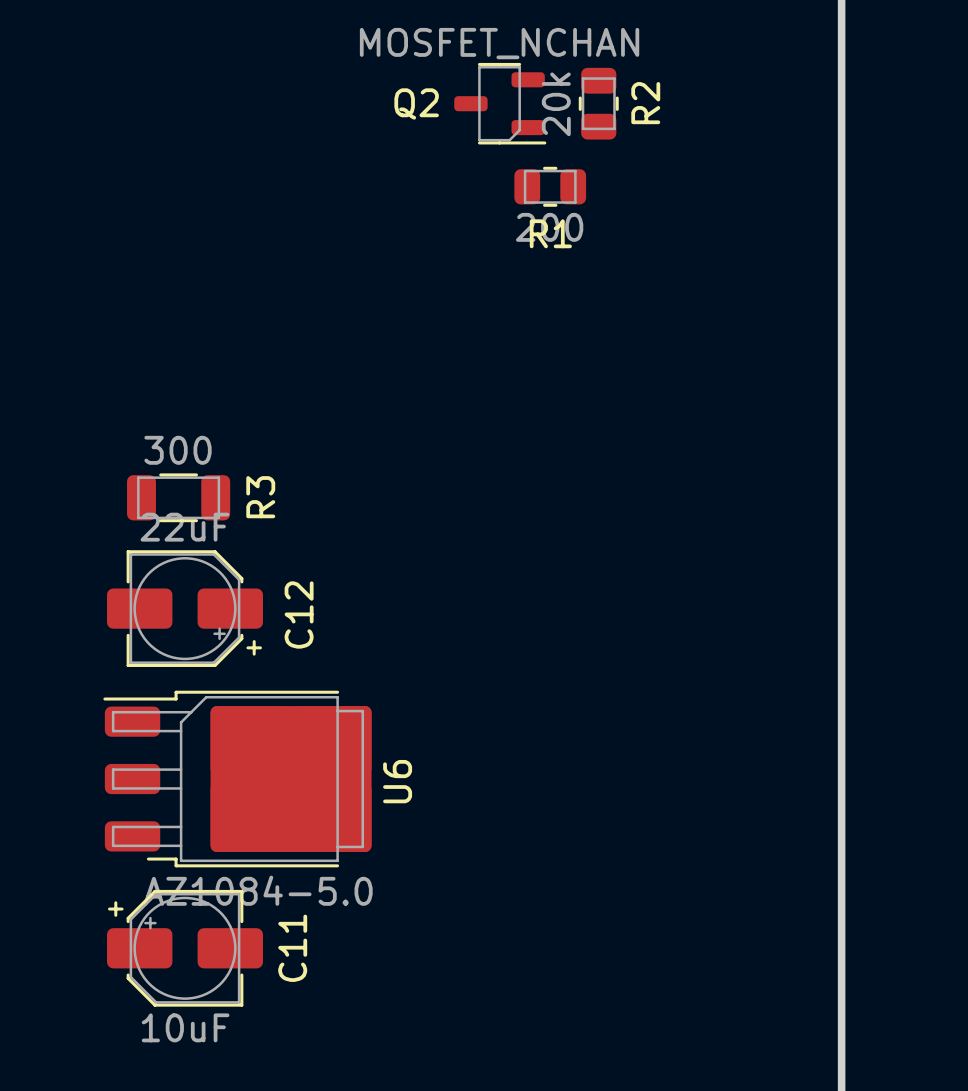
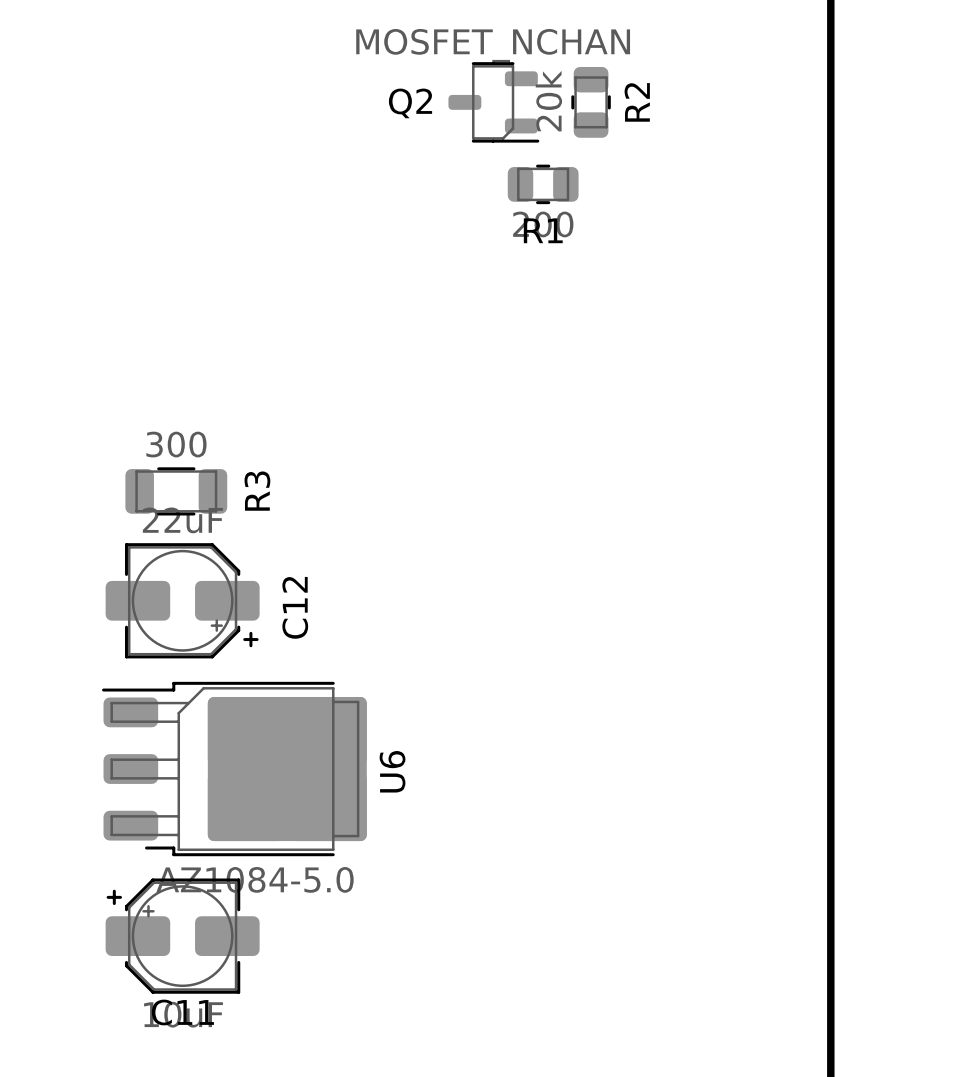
C11 name rotation: 0° (292, 948) -> 90° clockwise (182, 1012)
C11 name position: C11 (292, 948) -> C11 (182, 1012)

